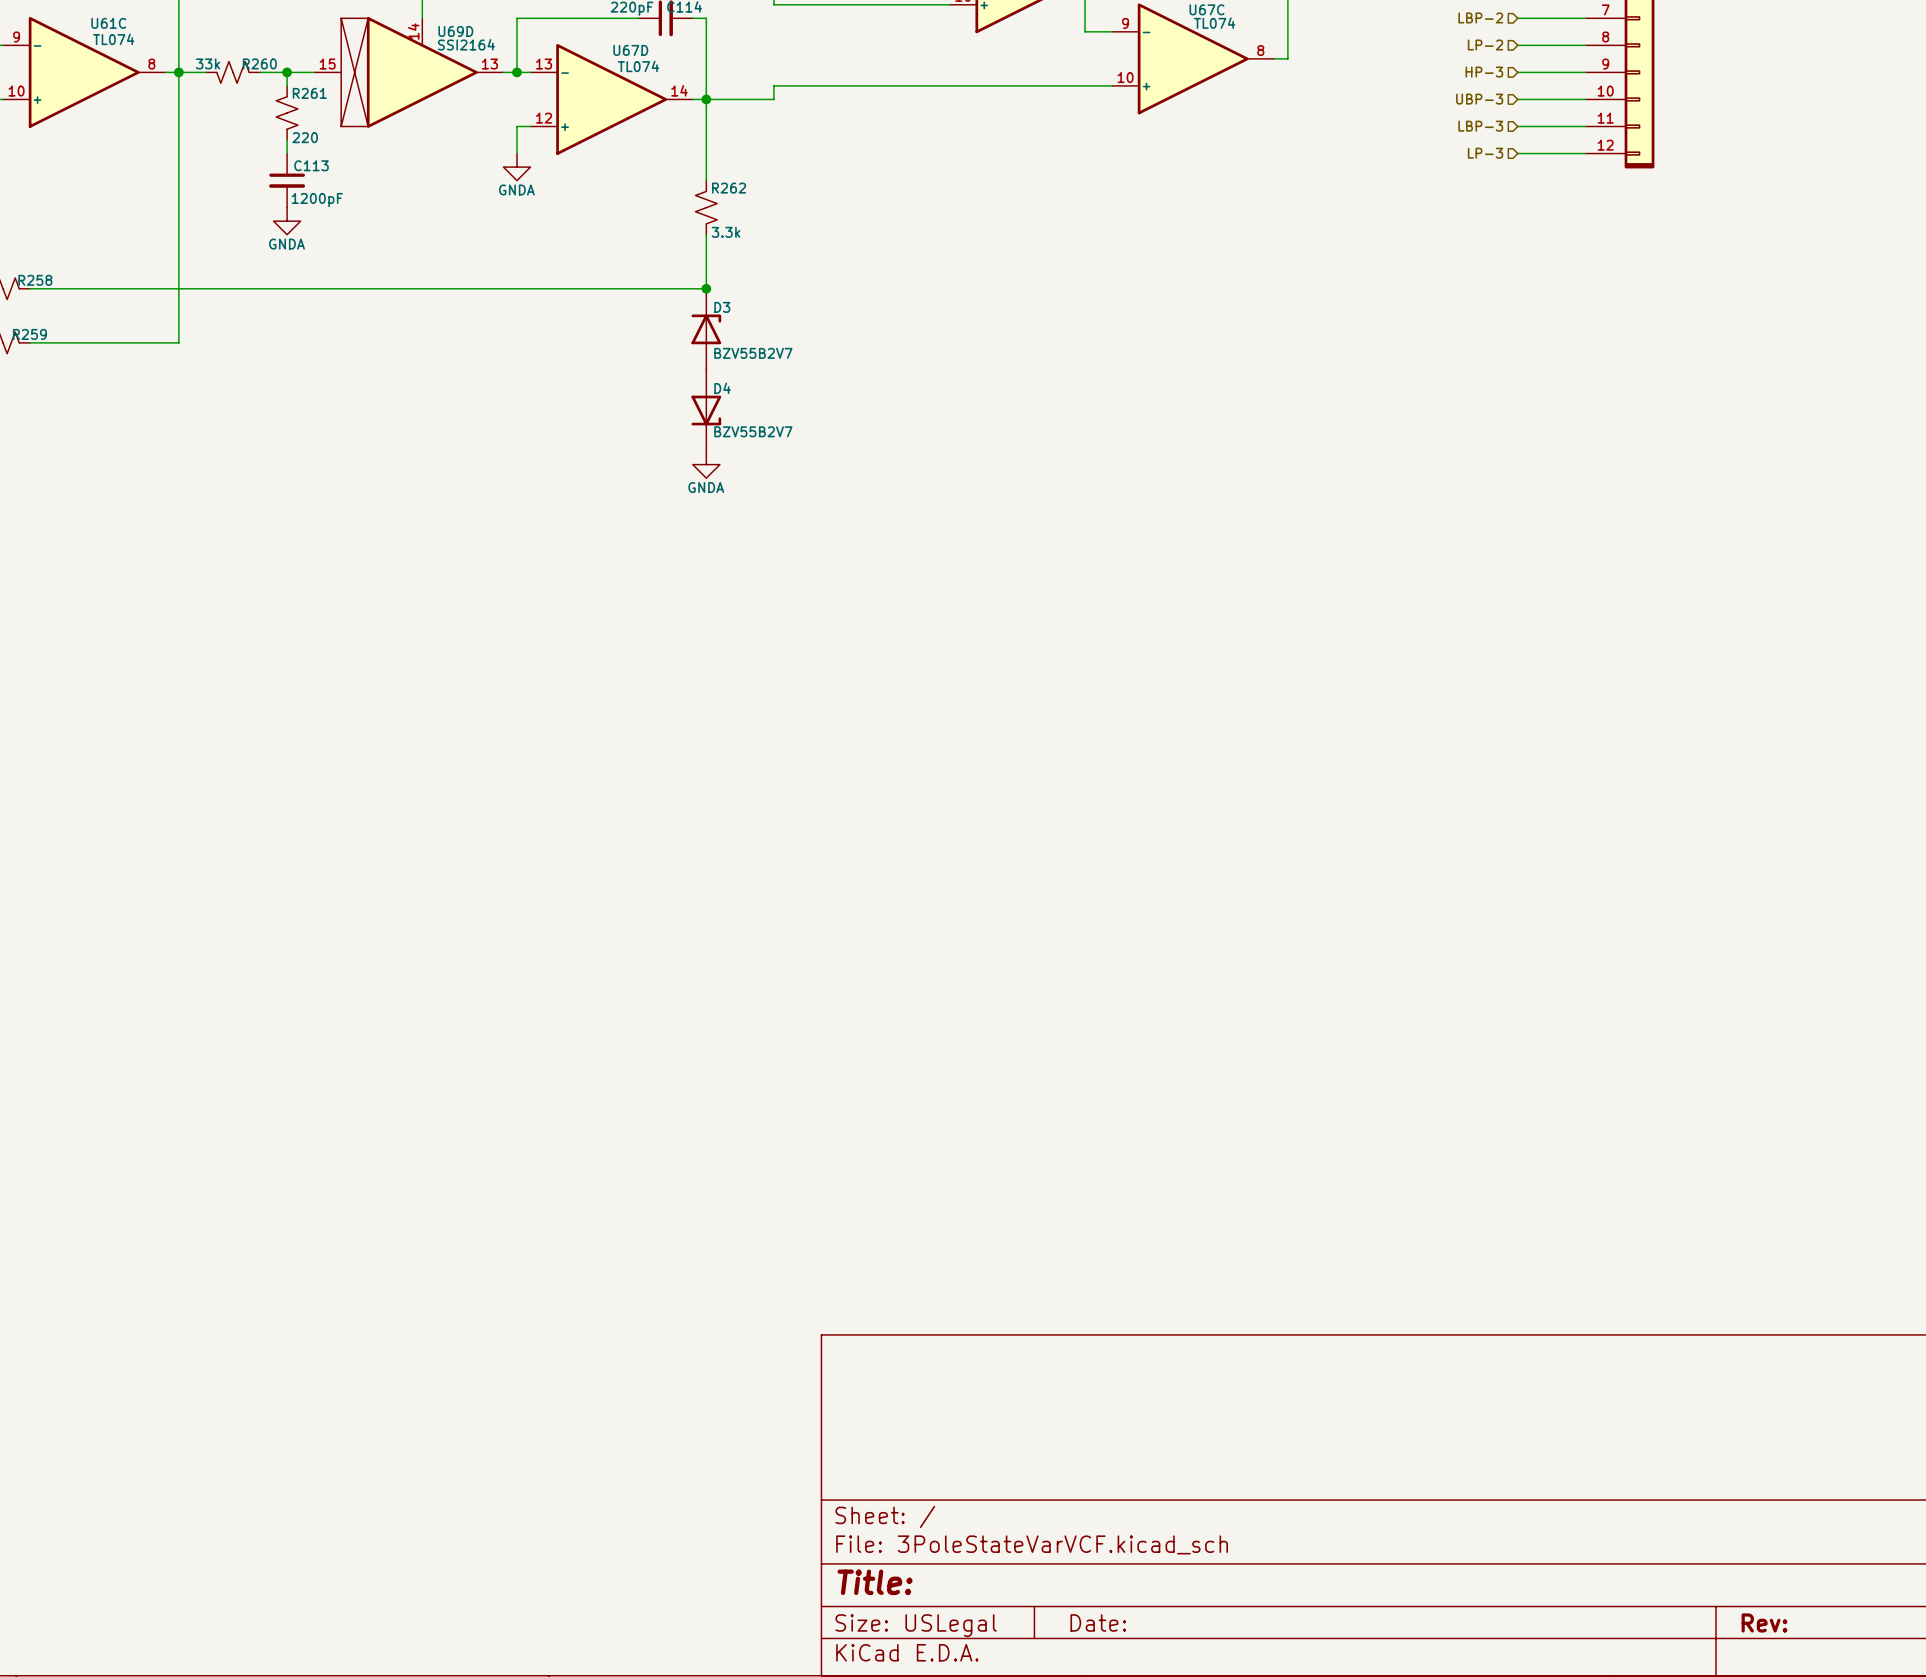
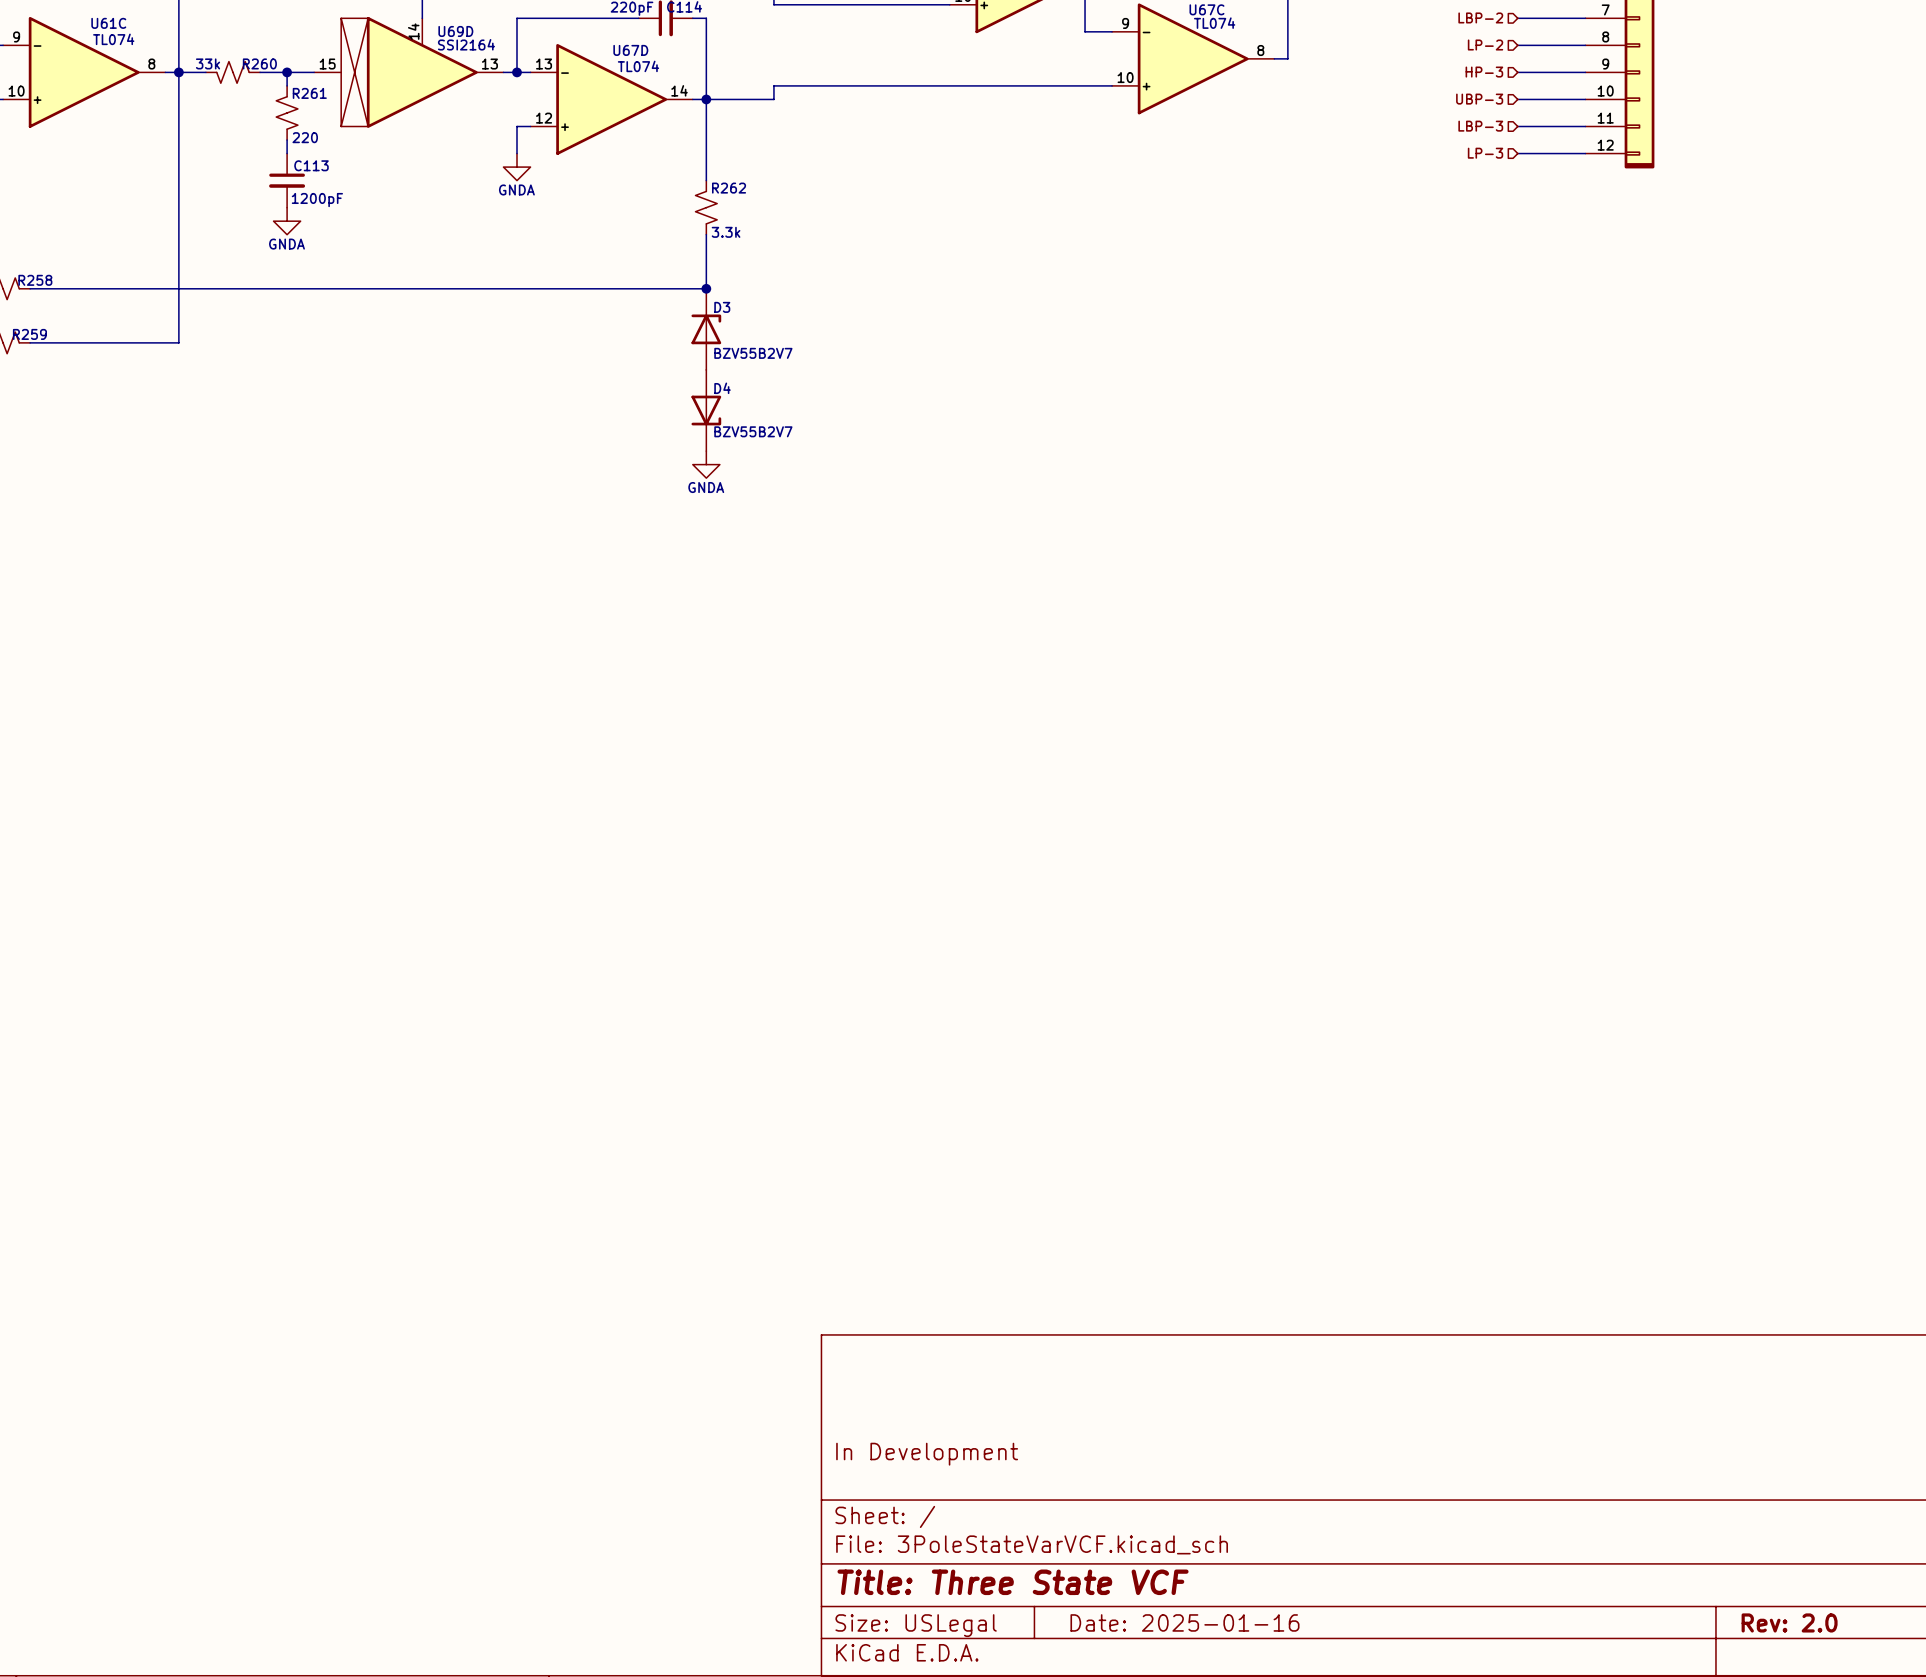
title block: none -> In Development (927, 1454)
title block: Title: (875, 1582) -> Title: Three State VCF (1013, 1582)
title block: Date: (1098, 1622) -> Date: 2025-01-16 (1184, 1622)
title block: Rev: (1764, 1622) -> Rev: 2.0 (1789, 1622)

